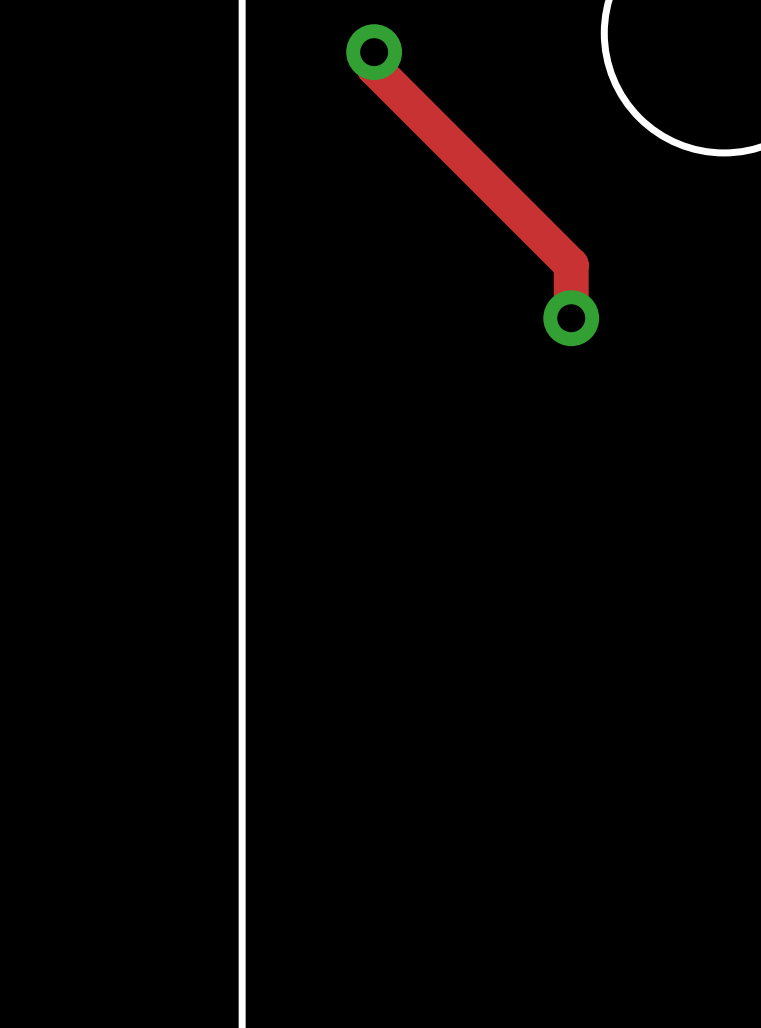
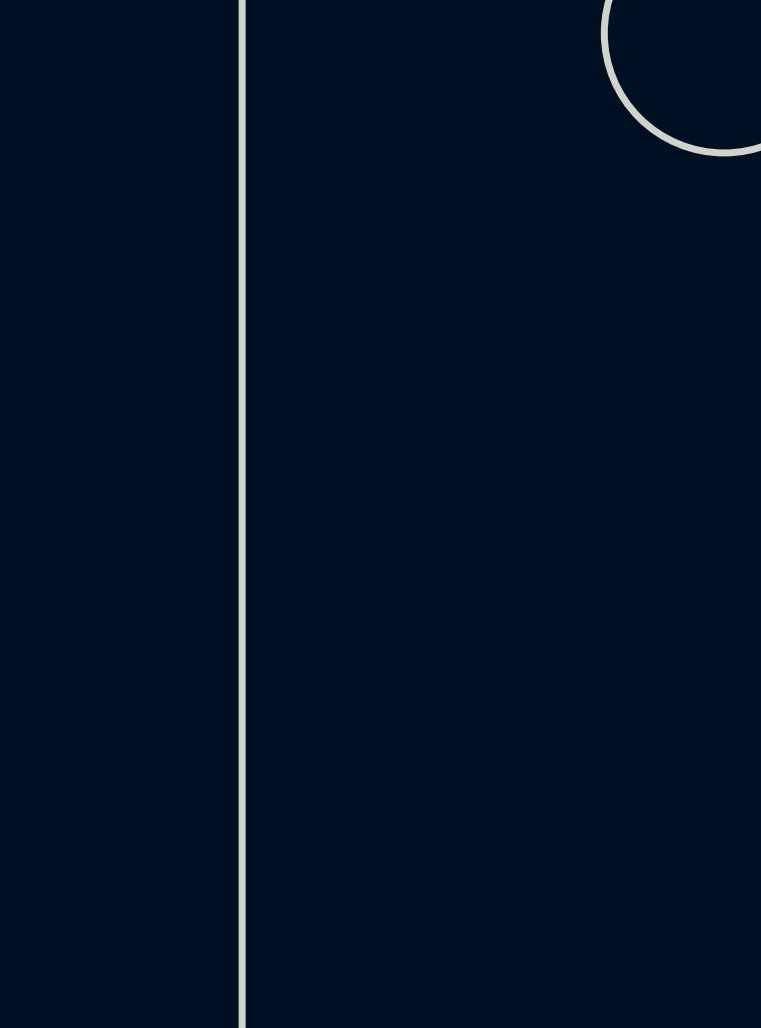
track: (374, 52) (374, 67) (571, 265) (571, 318) -> none
via: (374, 52) -> none
via: (571, 318) -> none

